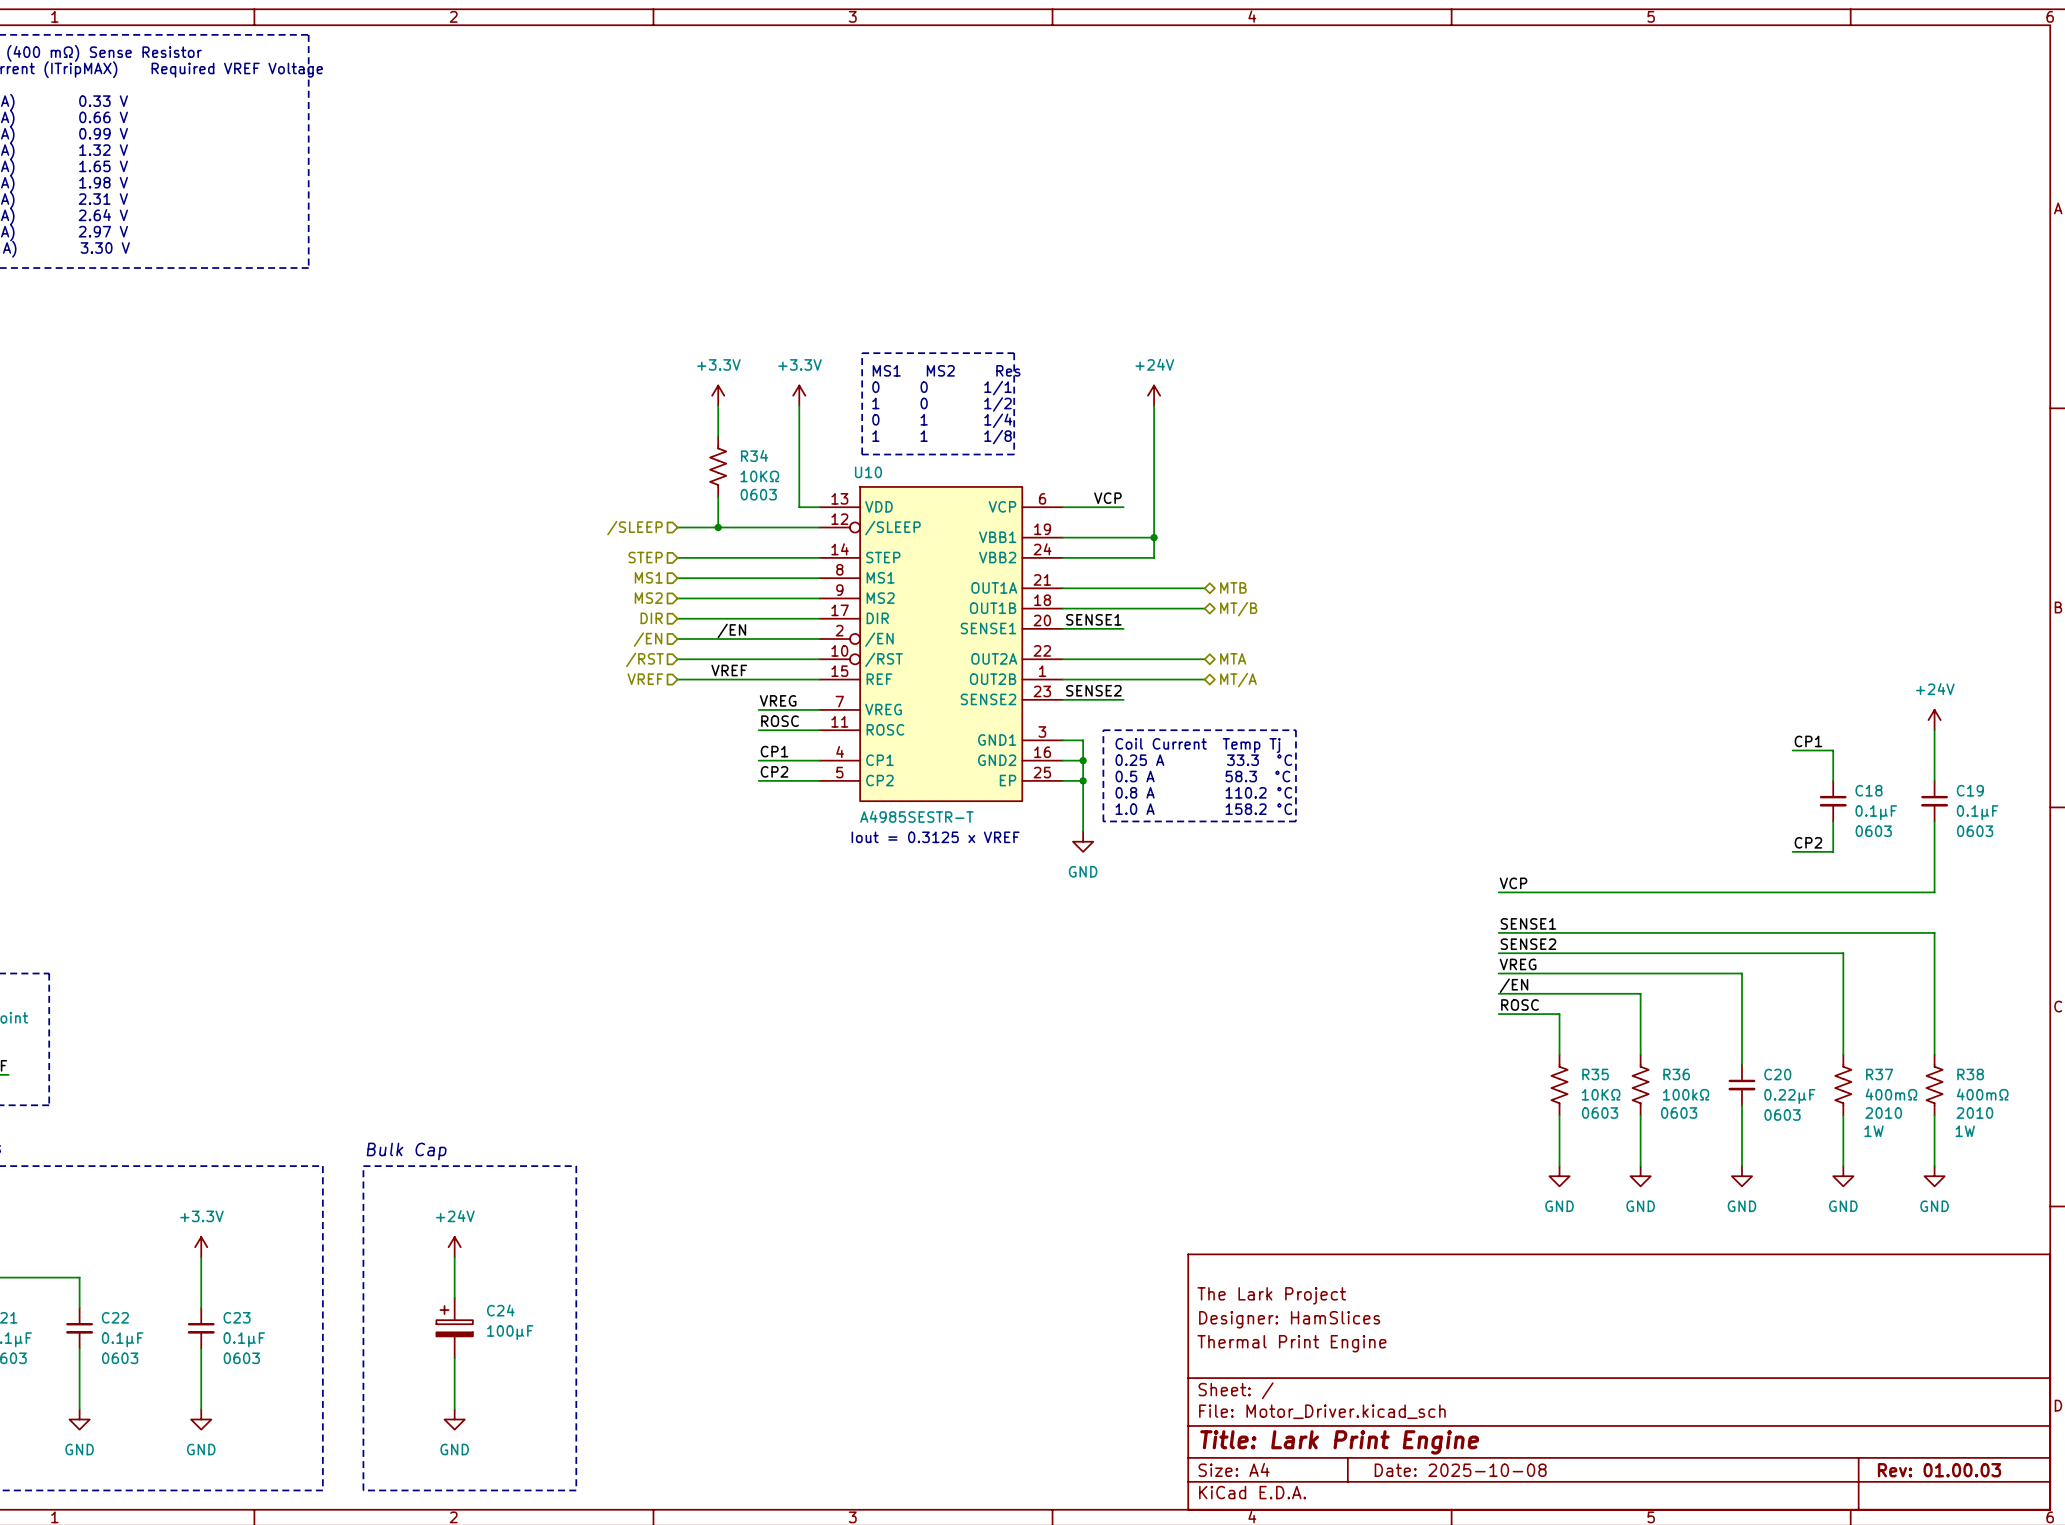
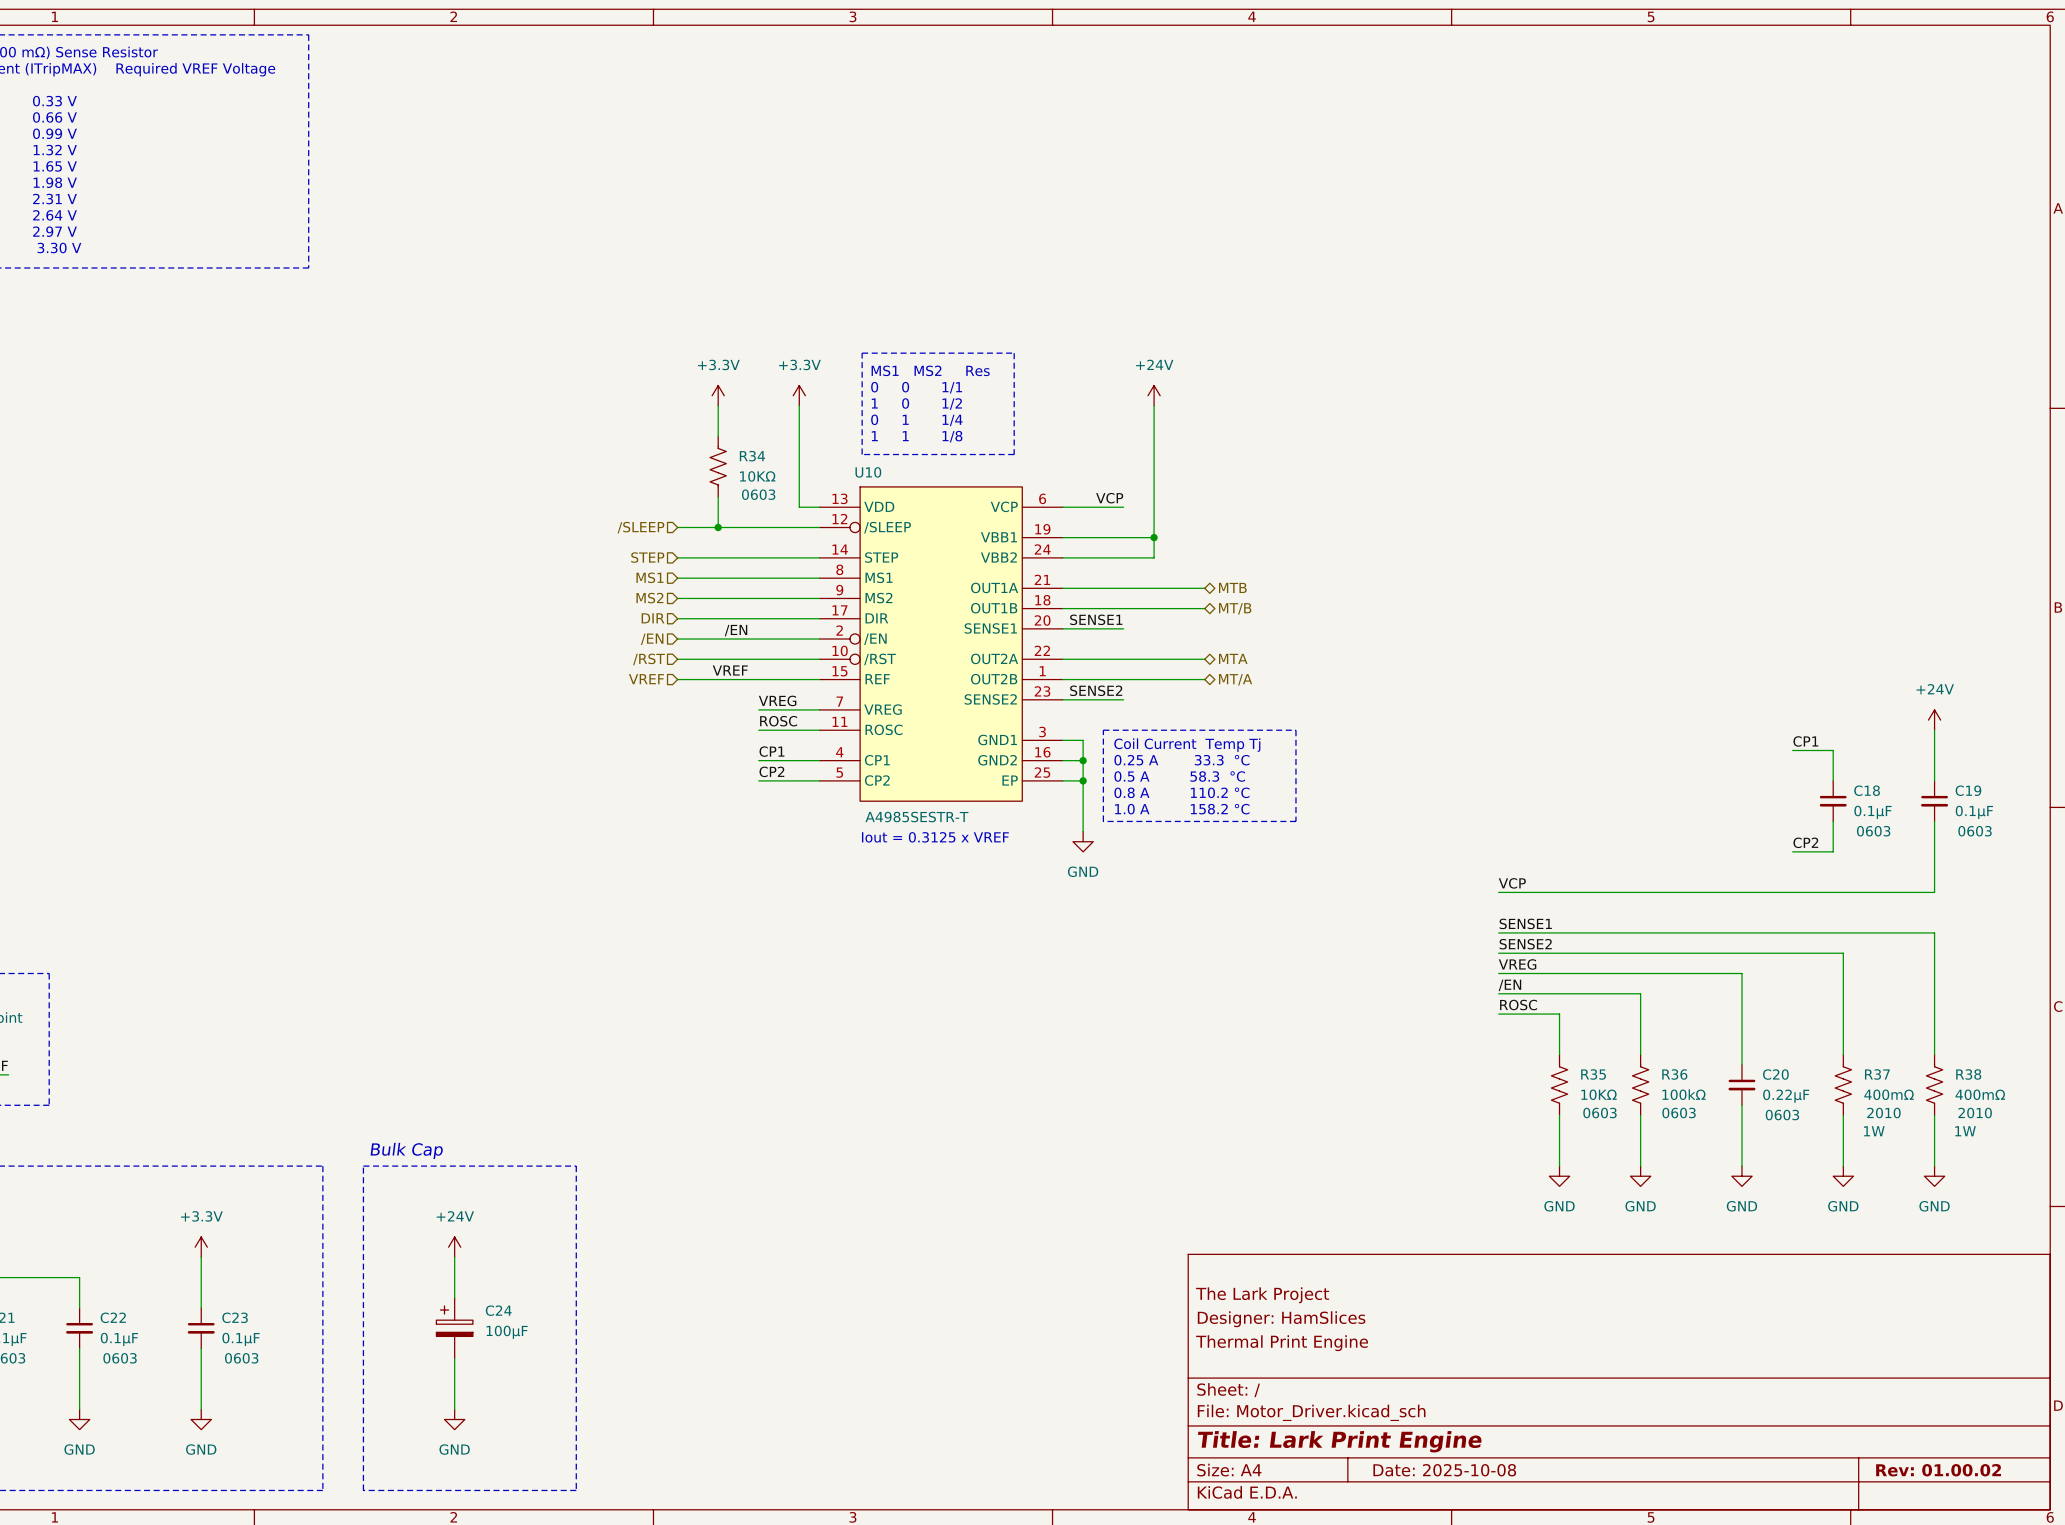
title block: Rev: 01.00.03 (1939, 1470) -> Rev: 01.00.02 (1938, 1470)

